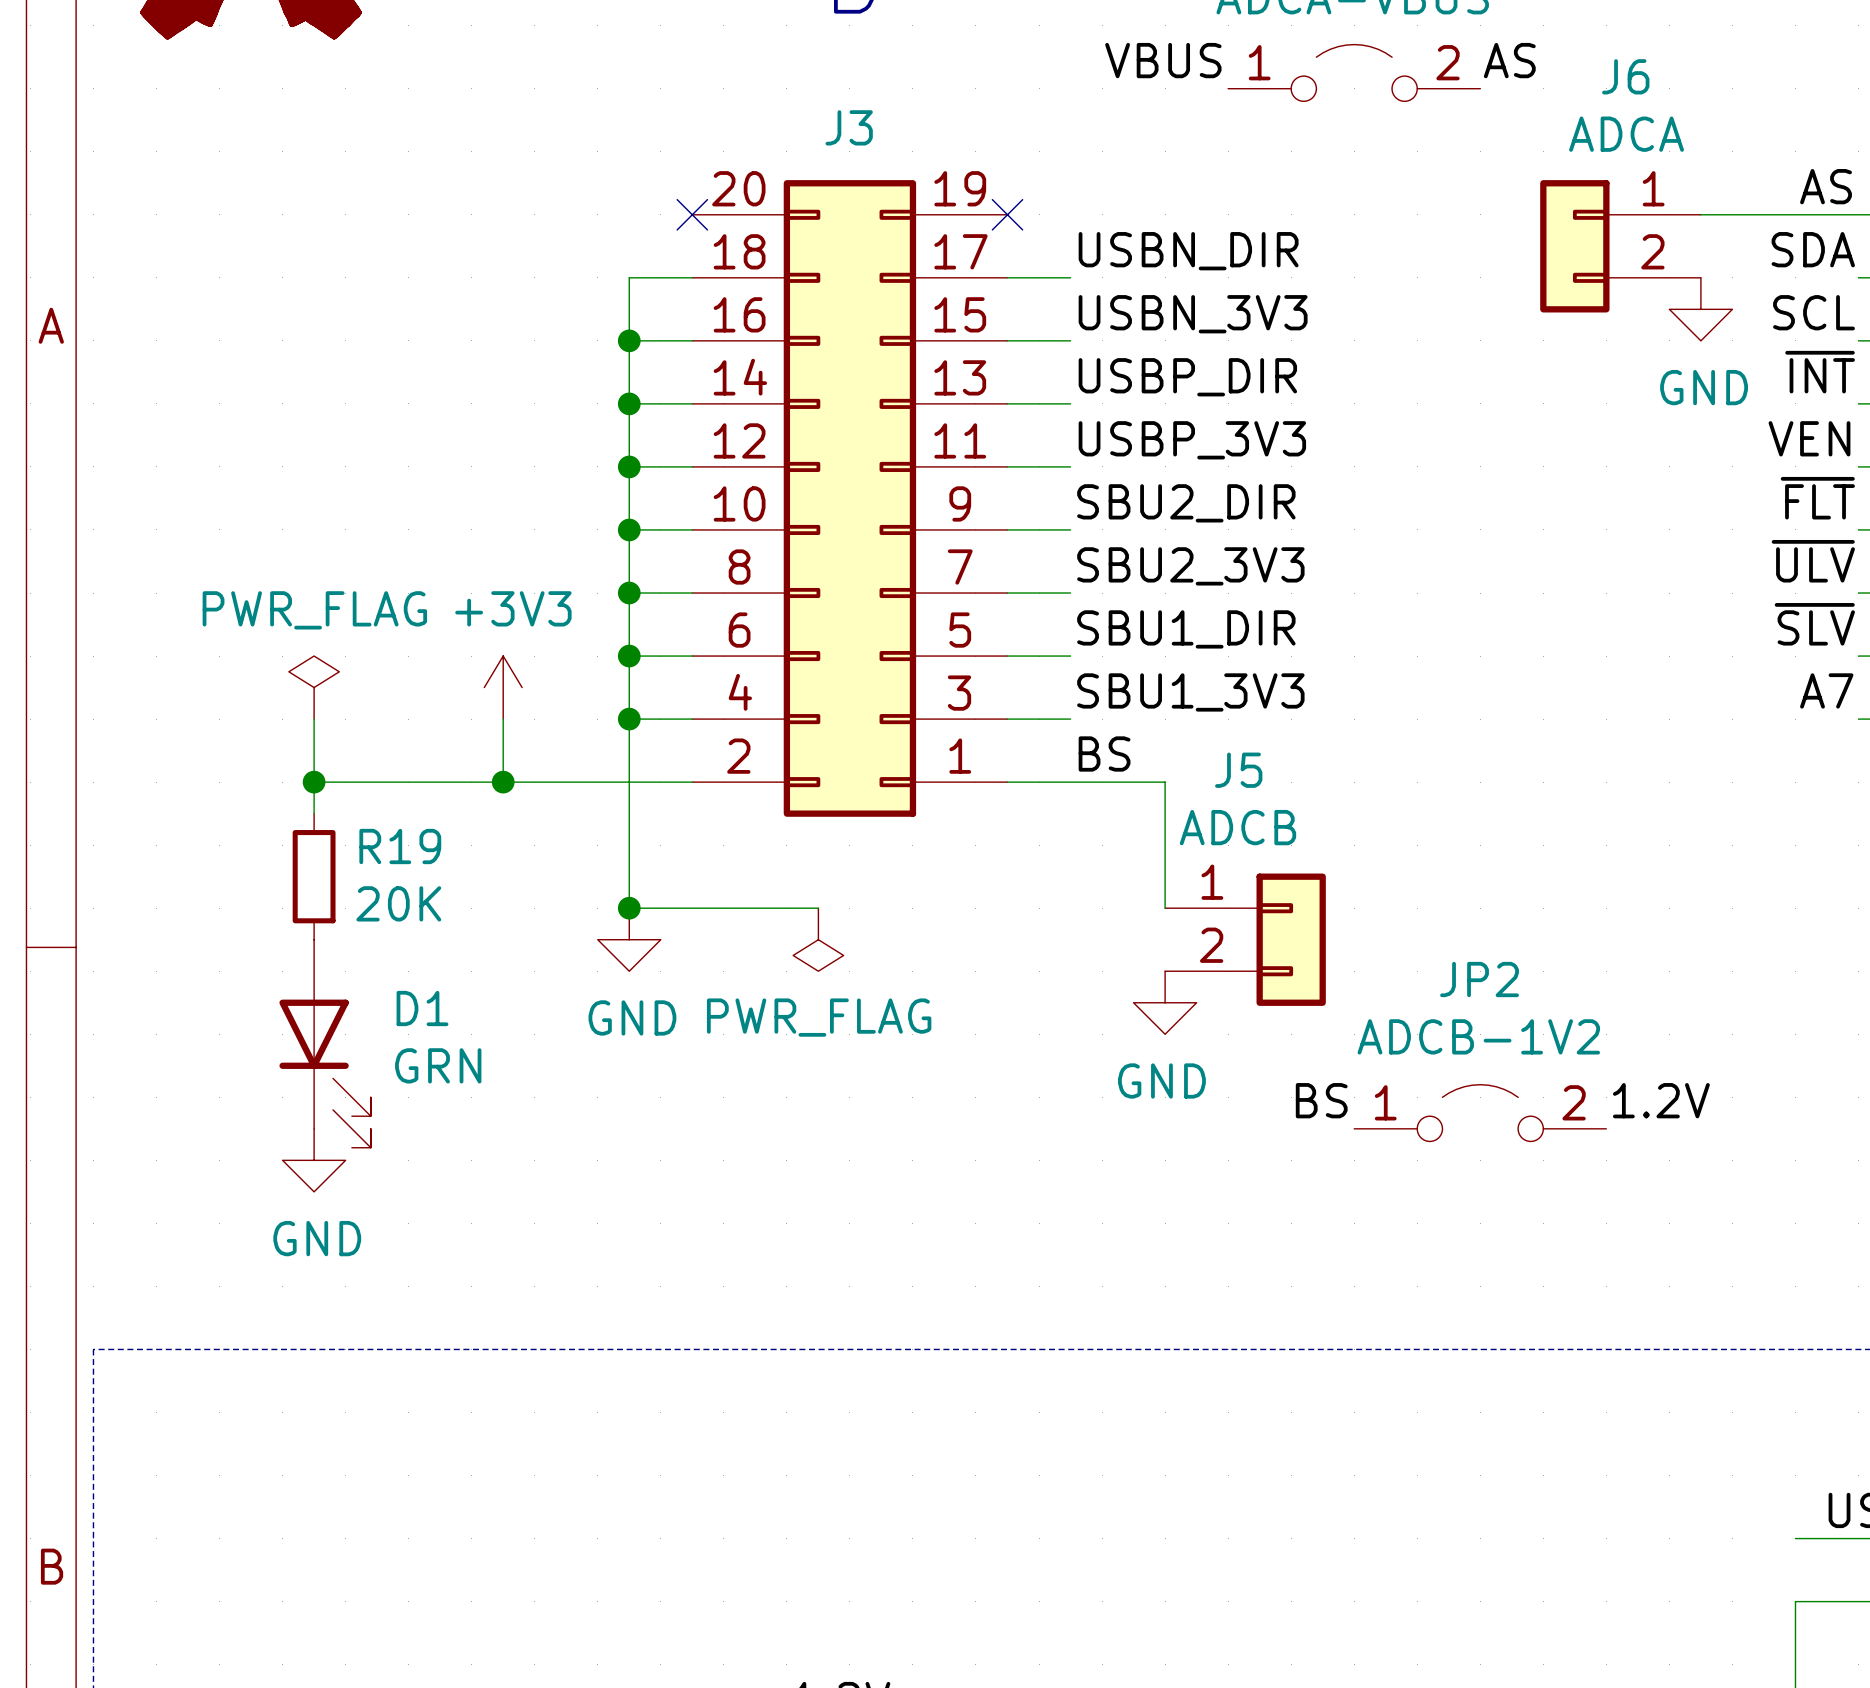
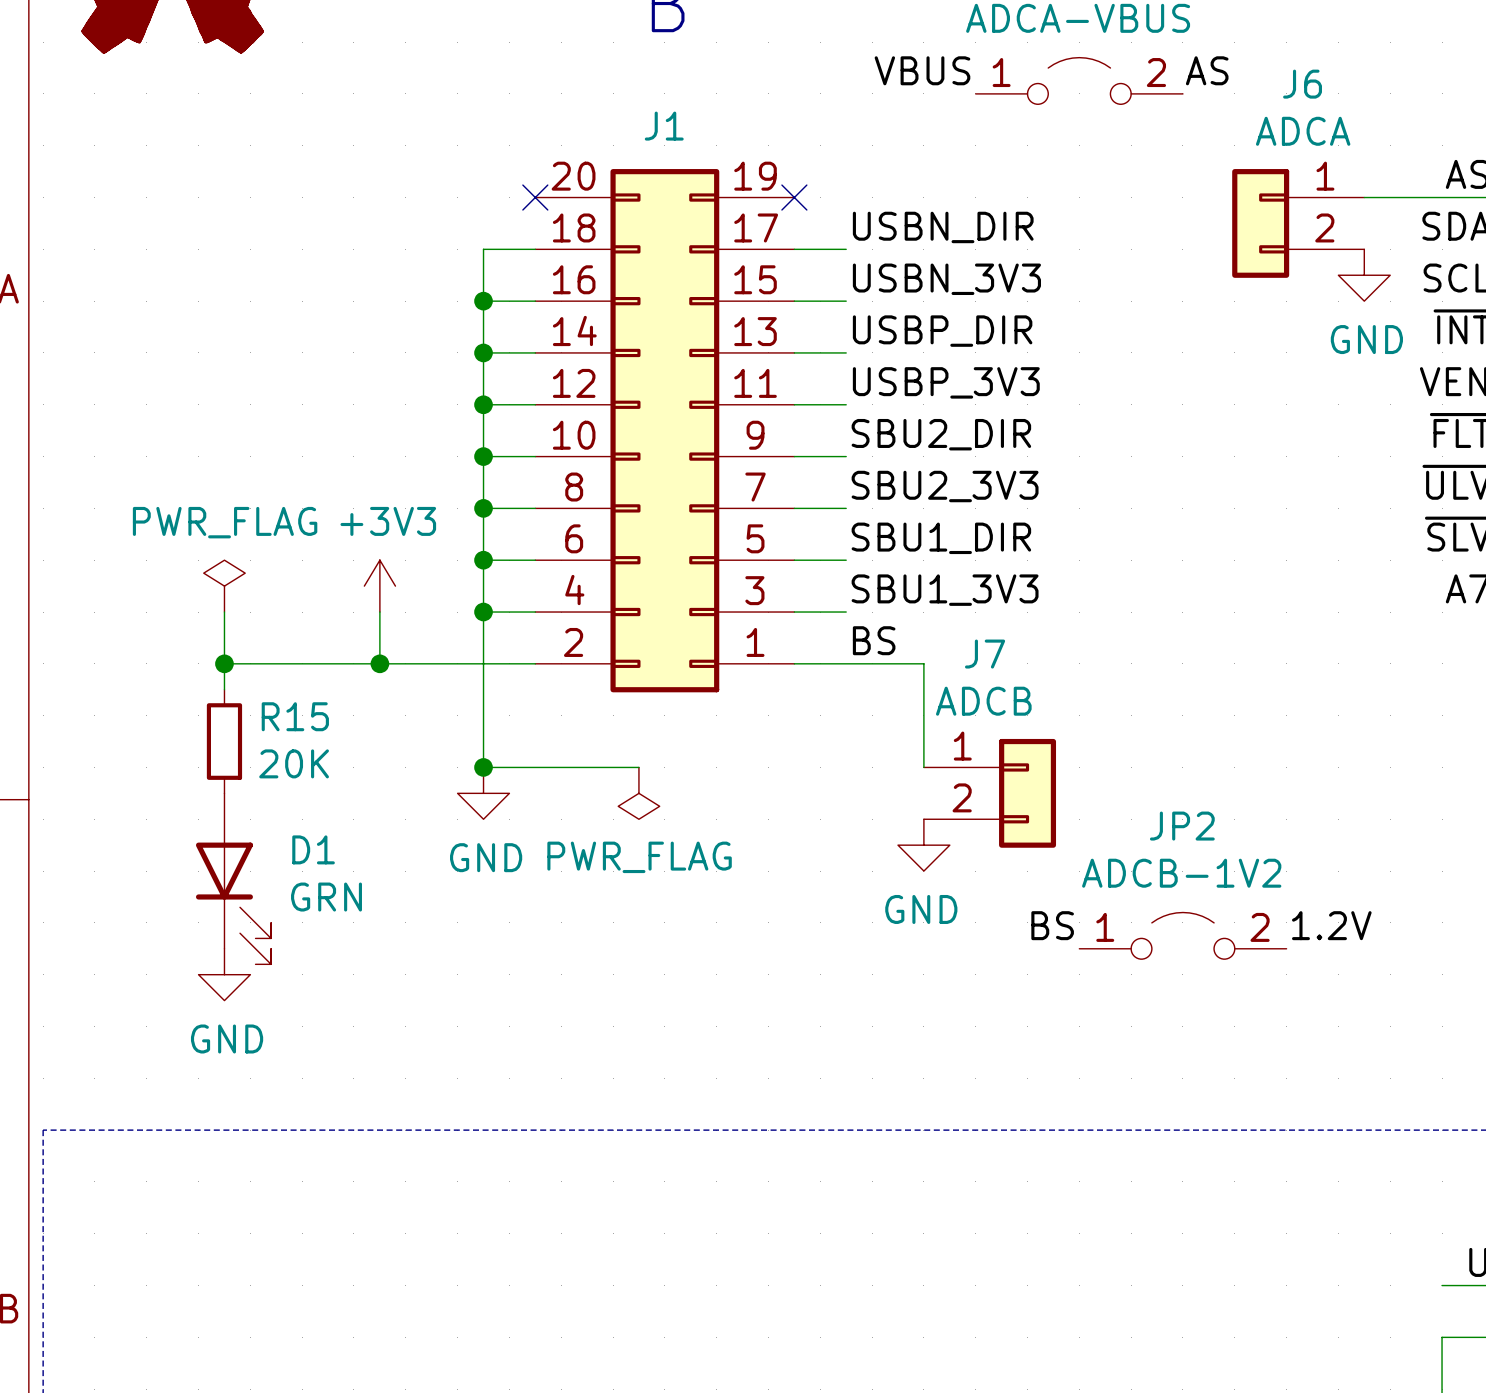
J3 name: J3 (849, 127) -> J1 (664, 126)
J5 name: J5 (1238, 770) -> J7 (985, 654)
R19 name: R19 (400, 846) -> R15 (295, 716)

